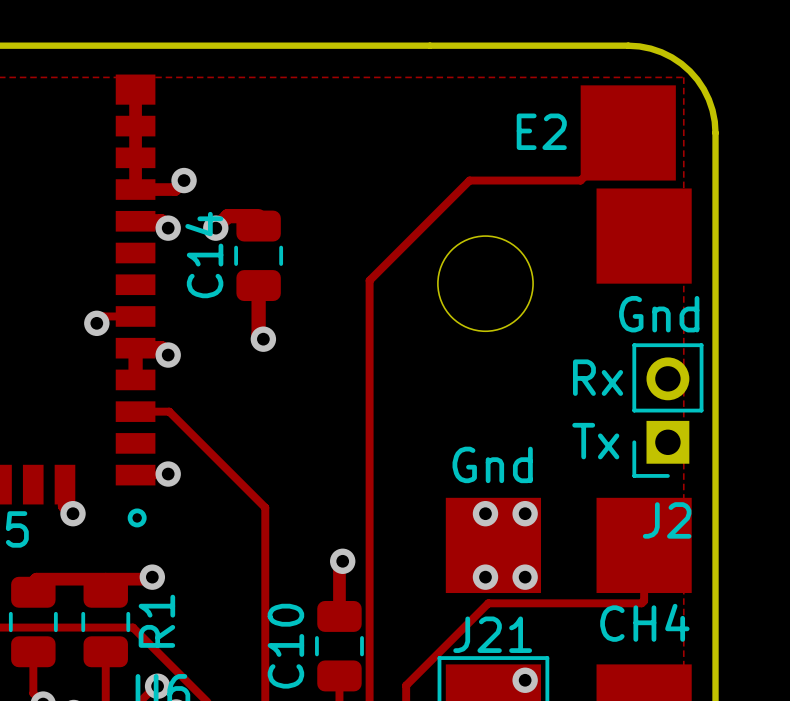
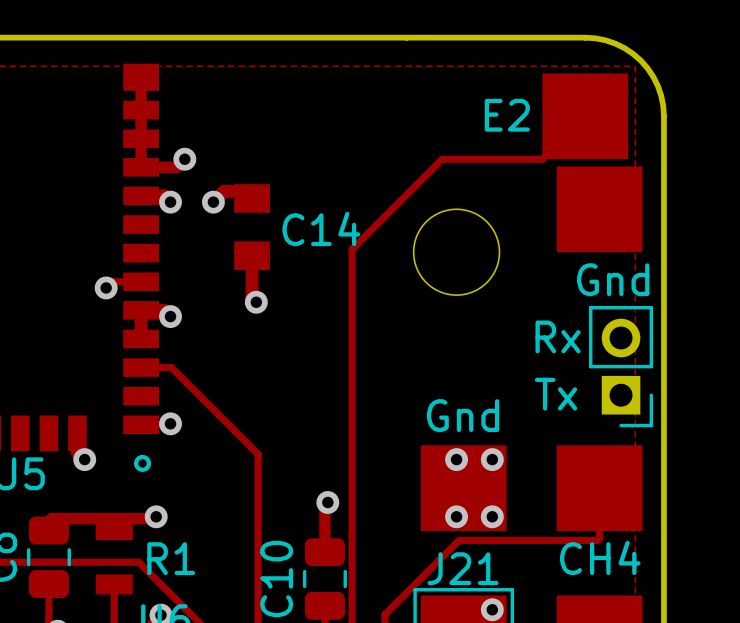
C14 footprint: [234, 210, 284, 302] -> [234, 184, 270, 270]
C14 name position: C14 (204, 255) -> C14 (321, 228)
J2: (667, 410) -> none
part: none -> (621, 366)
R1 footprint: [81, 576, 131, 668] -> [95, 520, 133, 595]

